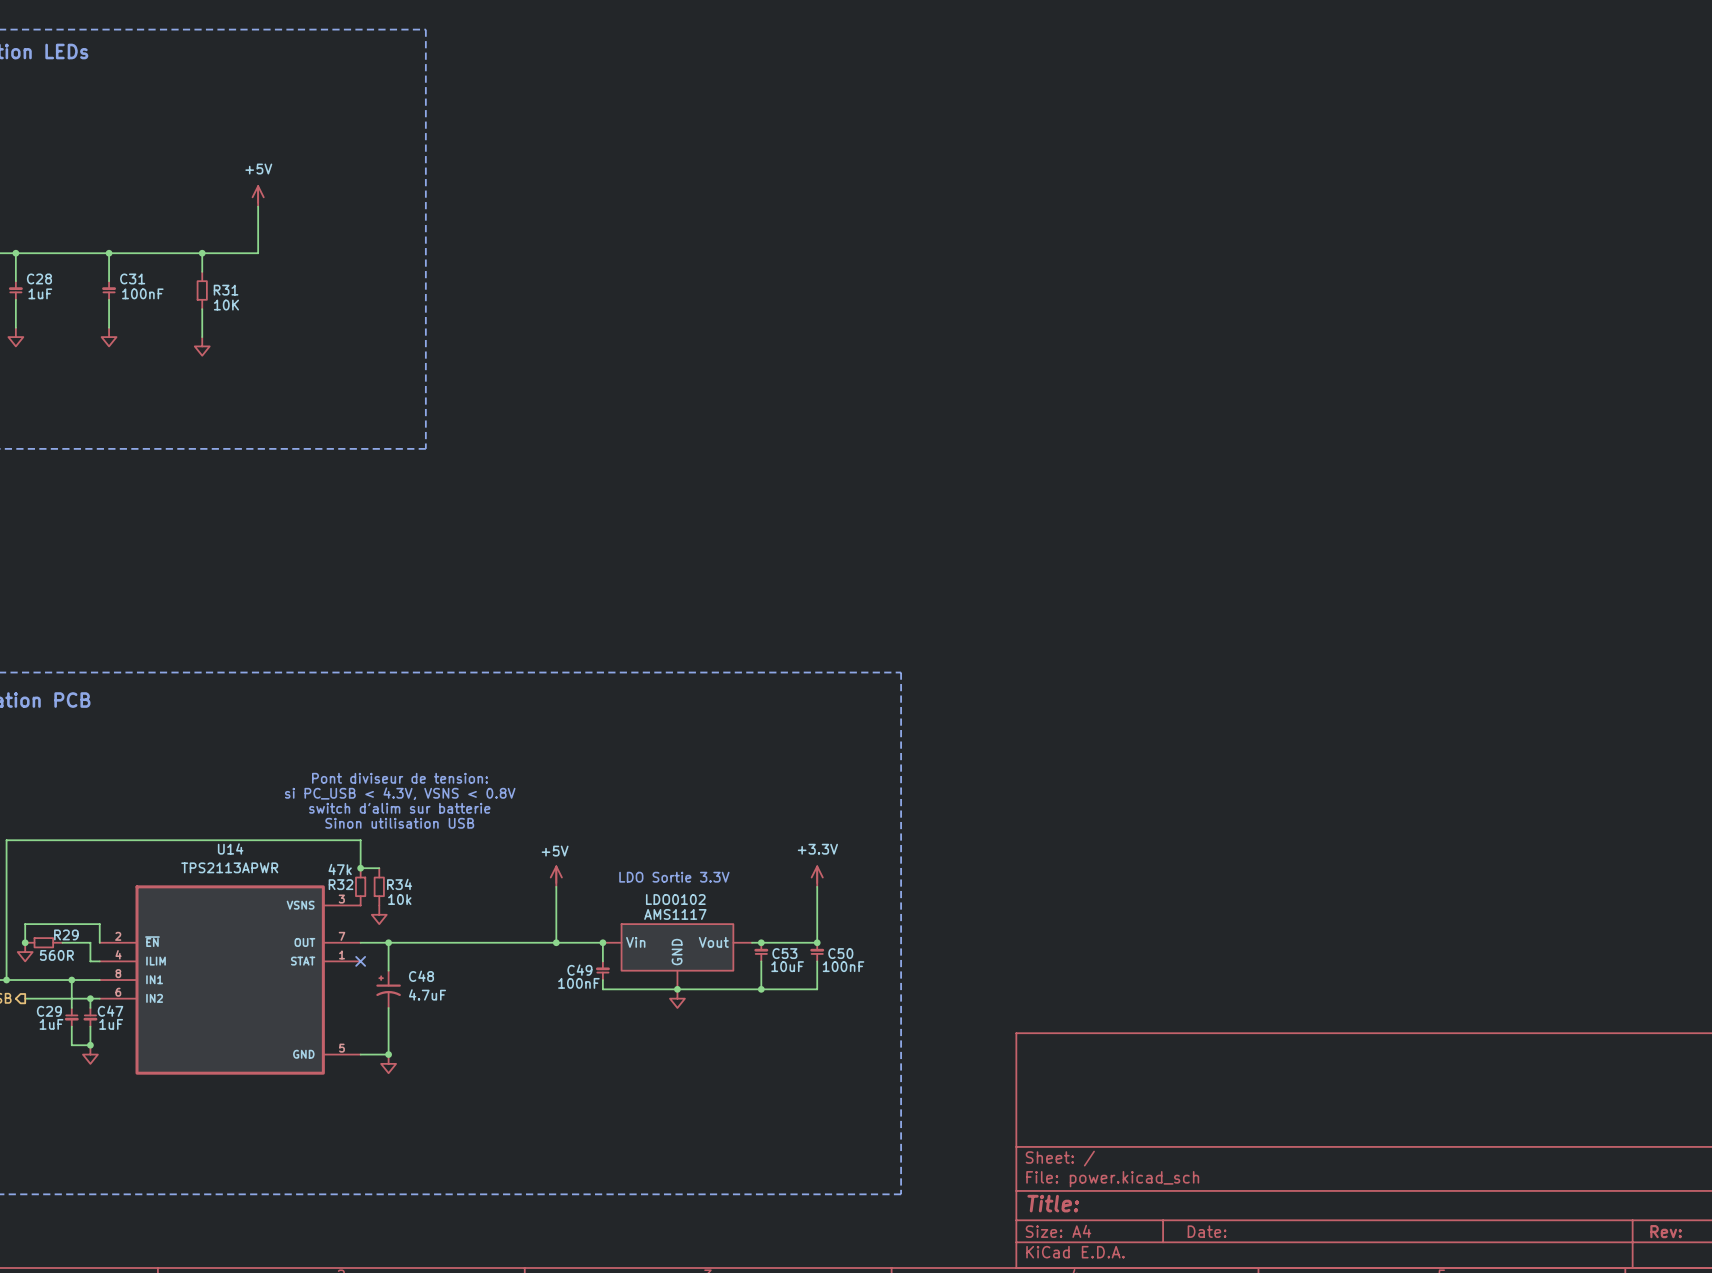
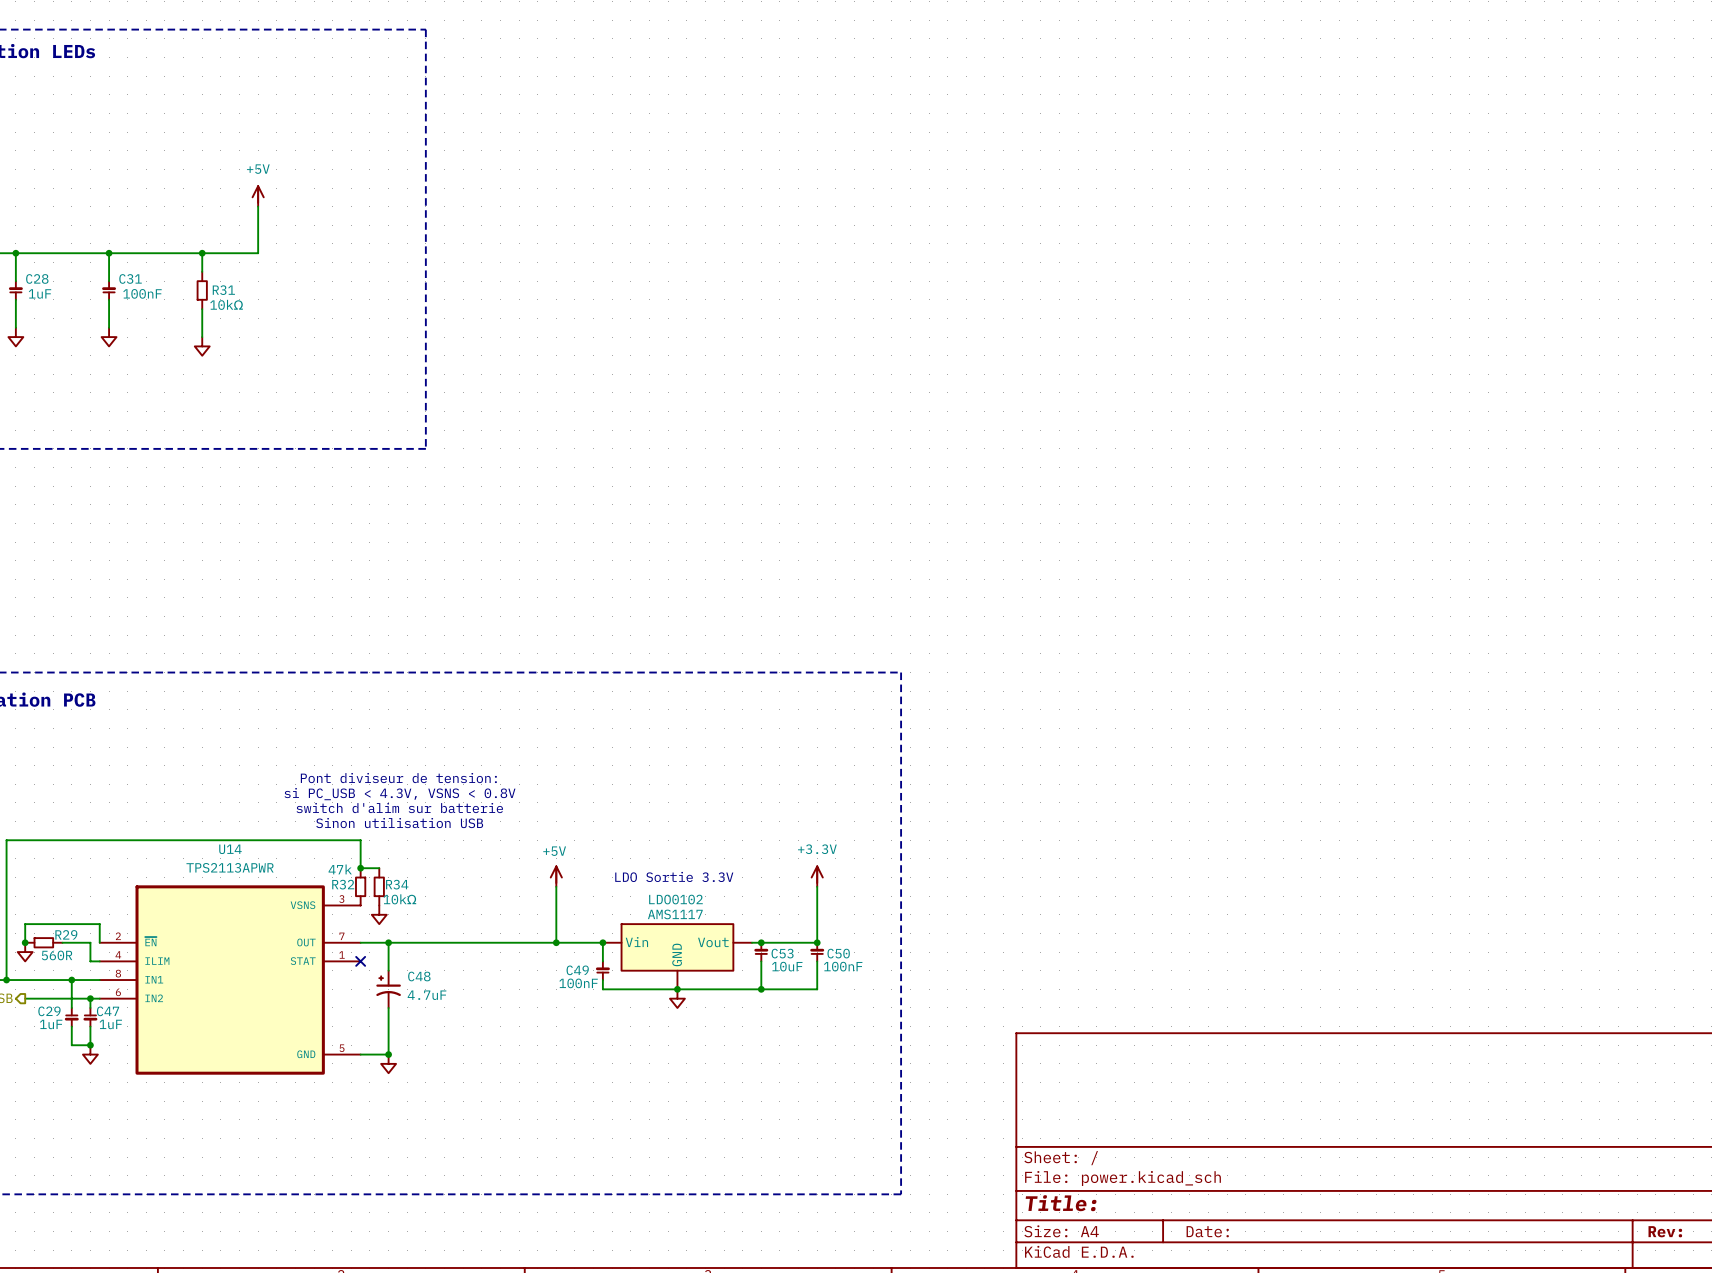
R31 value: 10K (226, 305) -> 10kΩ (226, 304)
R34 value: 10k (399, 899) -> 10kΩ (399, 899)

